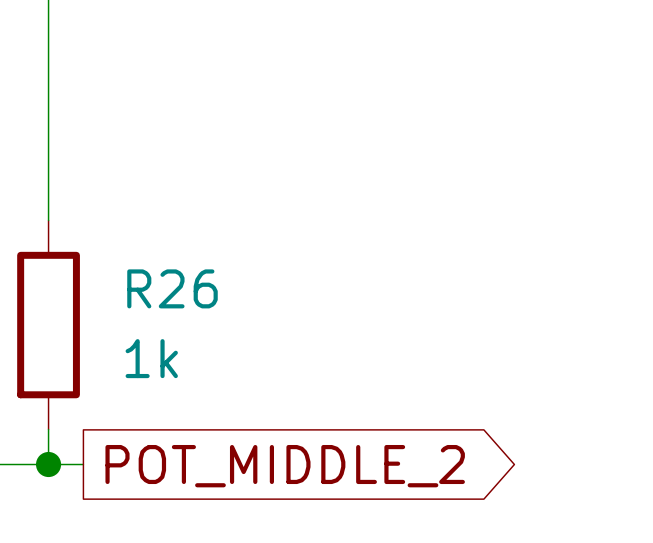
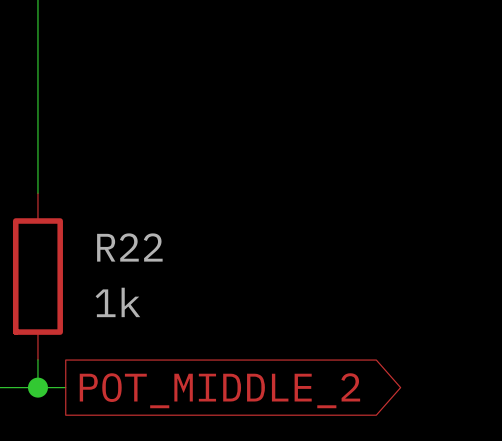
R26 name: R26 (172, 288) -> R22 (129, 247)

